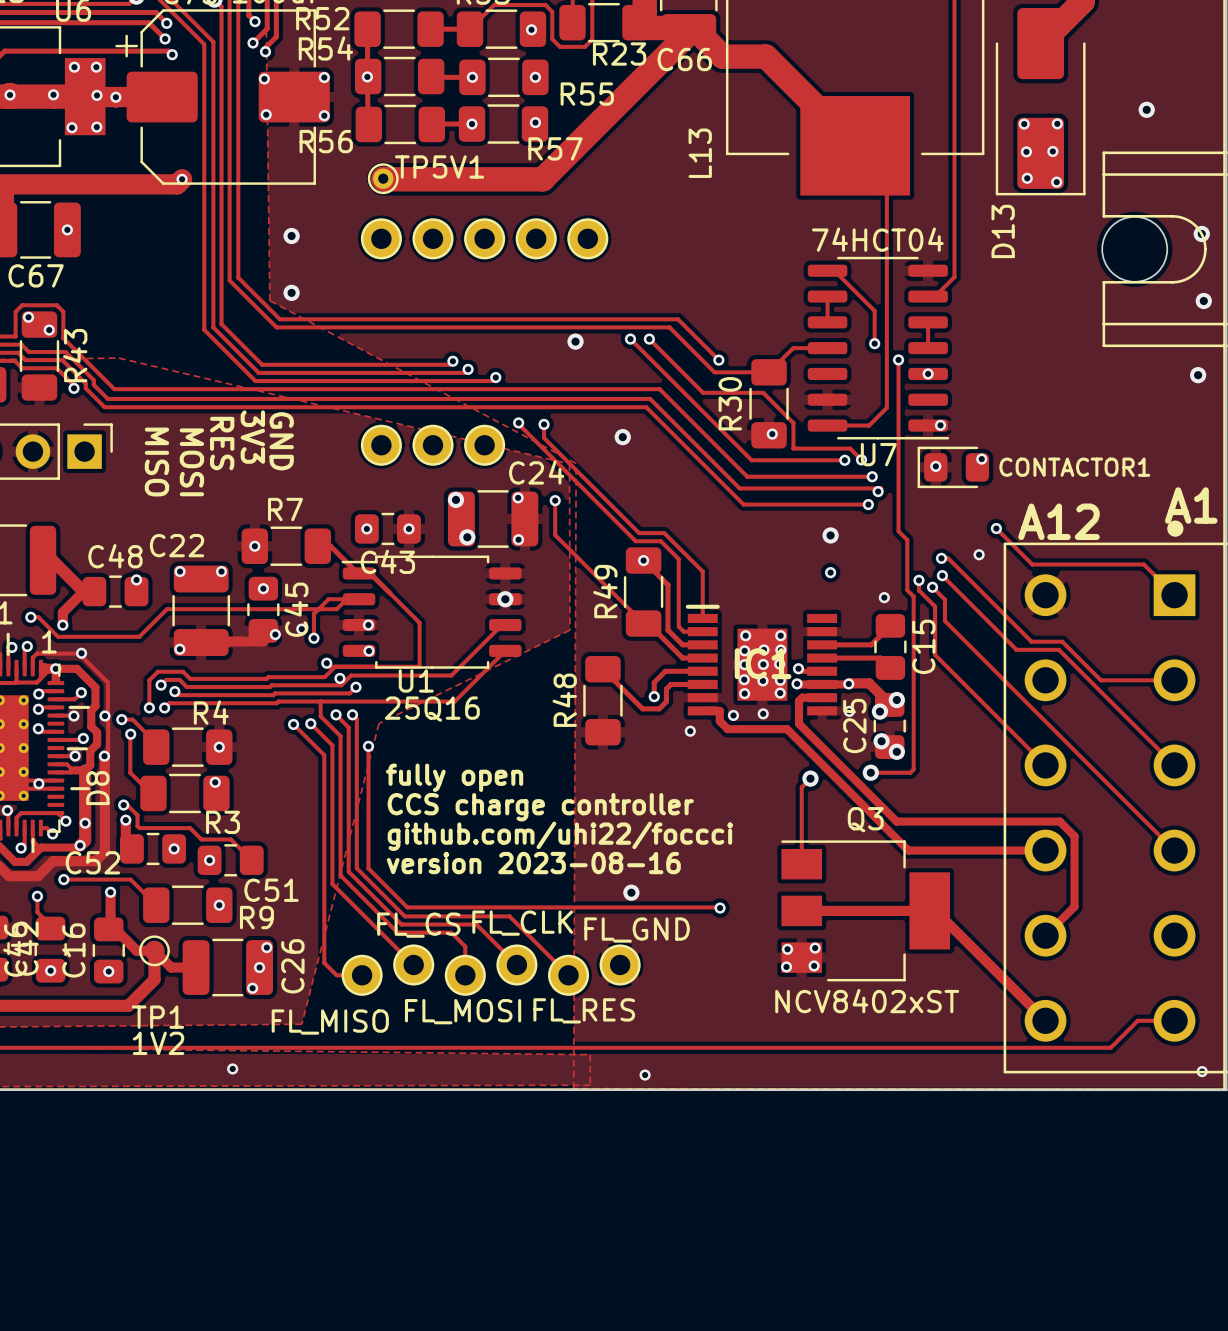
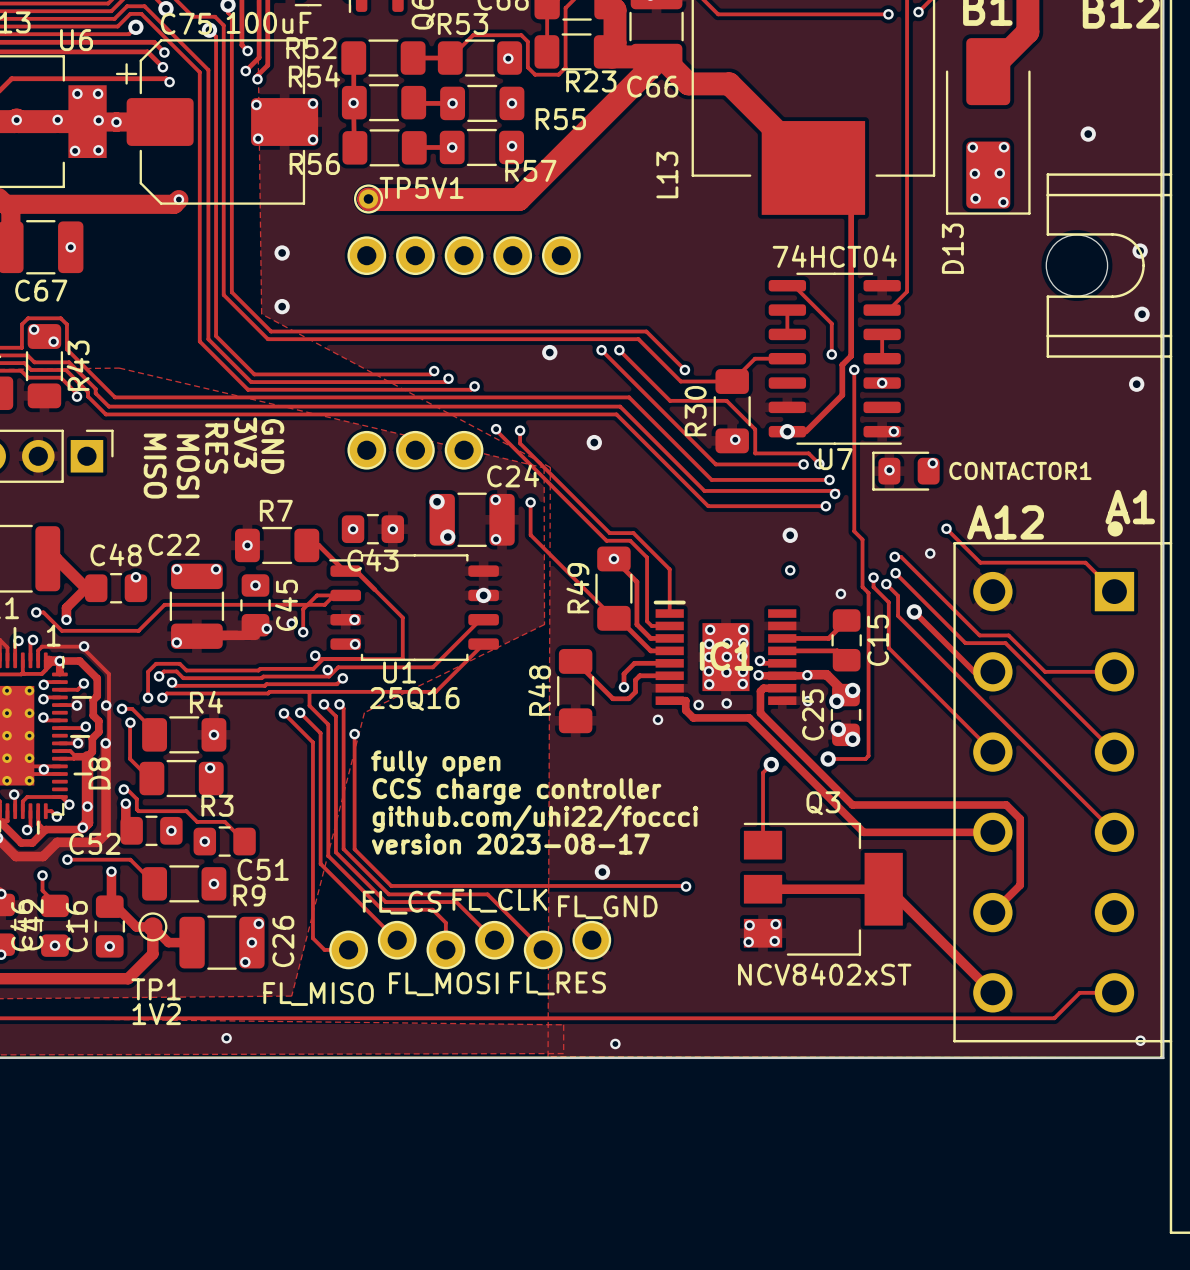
track: (886, 177) (886, 407) (869, 425) (847, 425) -> (813, 167) (851, 205) (851, 356) (842, 364) (842, 395) (805, 431)
via: none -> (787, 431)
track: none -> (914, 611) (974, 671) (992, 671)
via: none -> (914, 611)
text: version 2023-08-16 (533, 863) -> version 2023-08-17 (510, 844)

